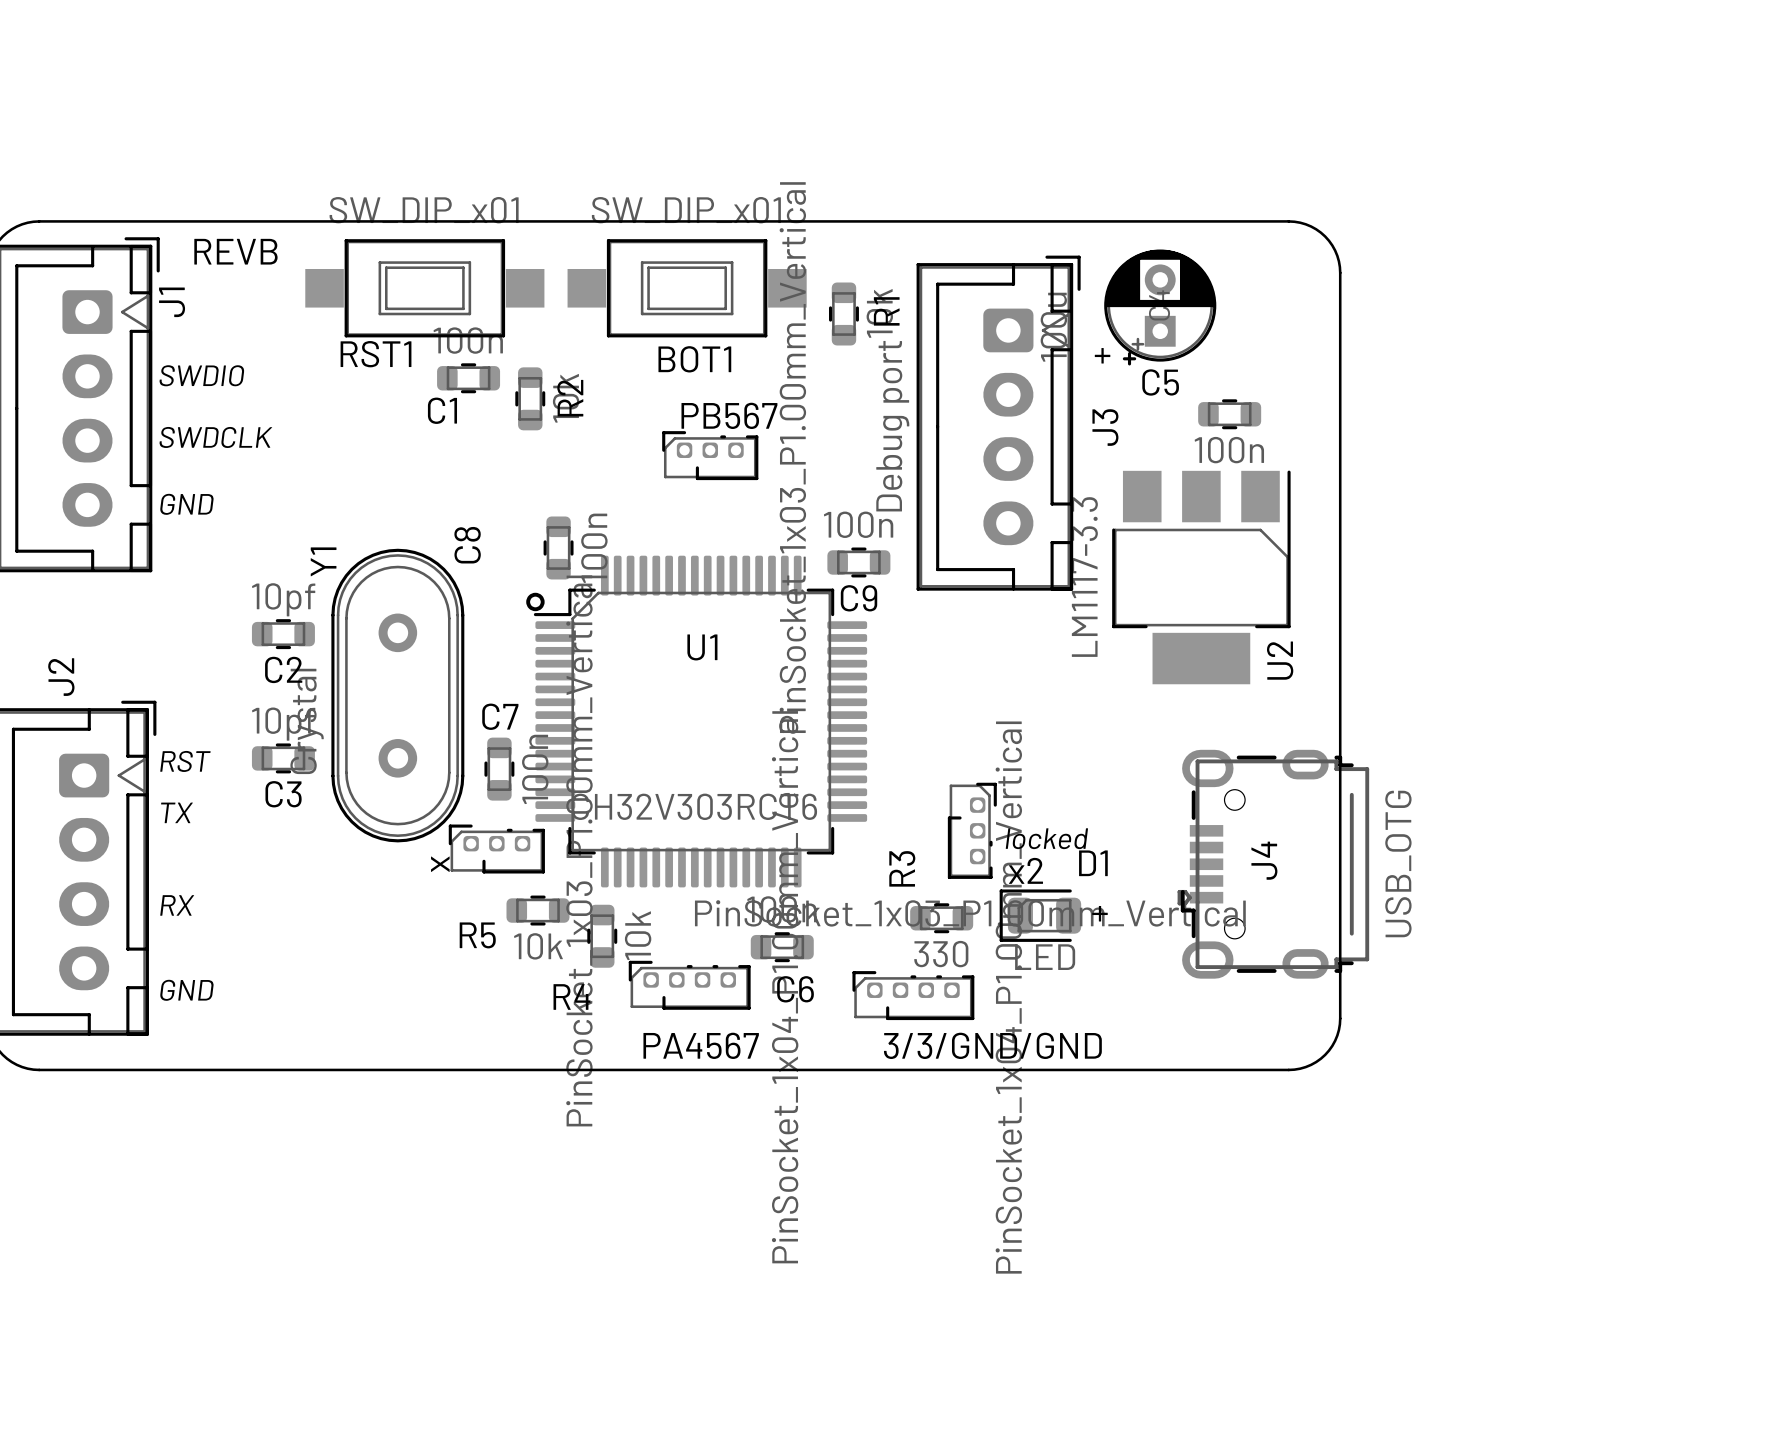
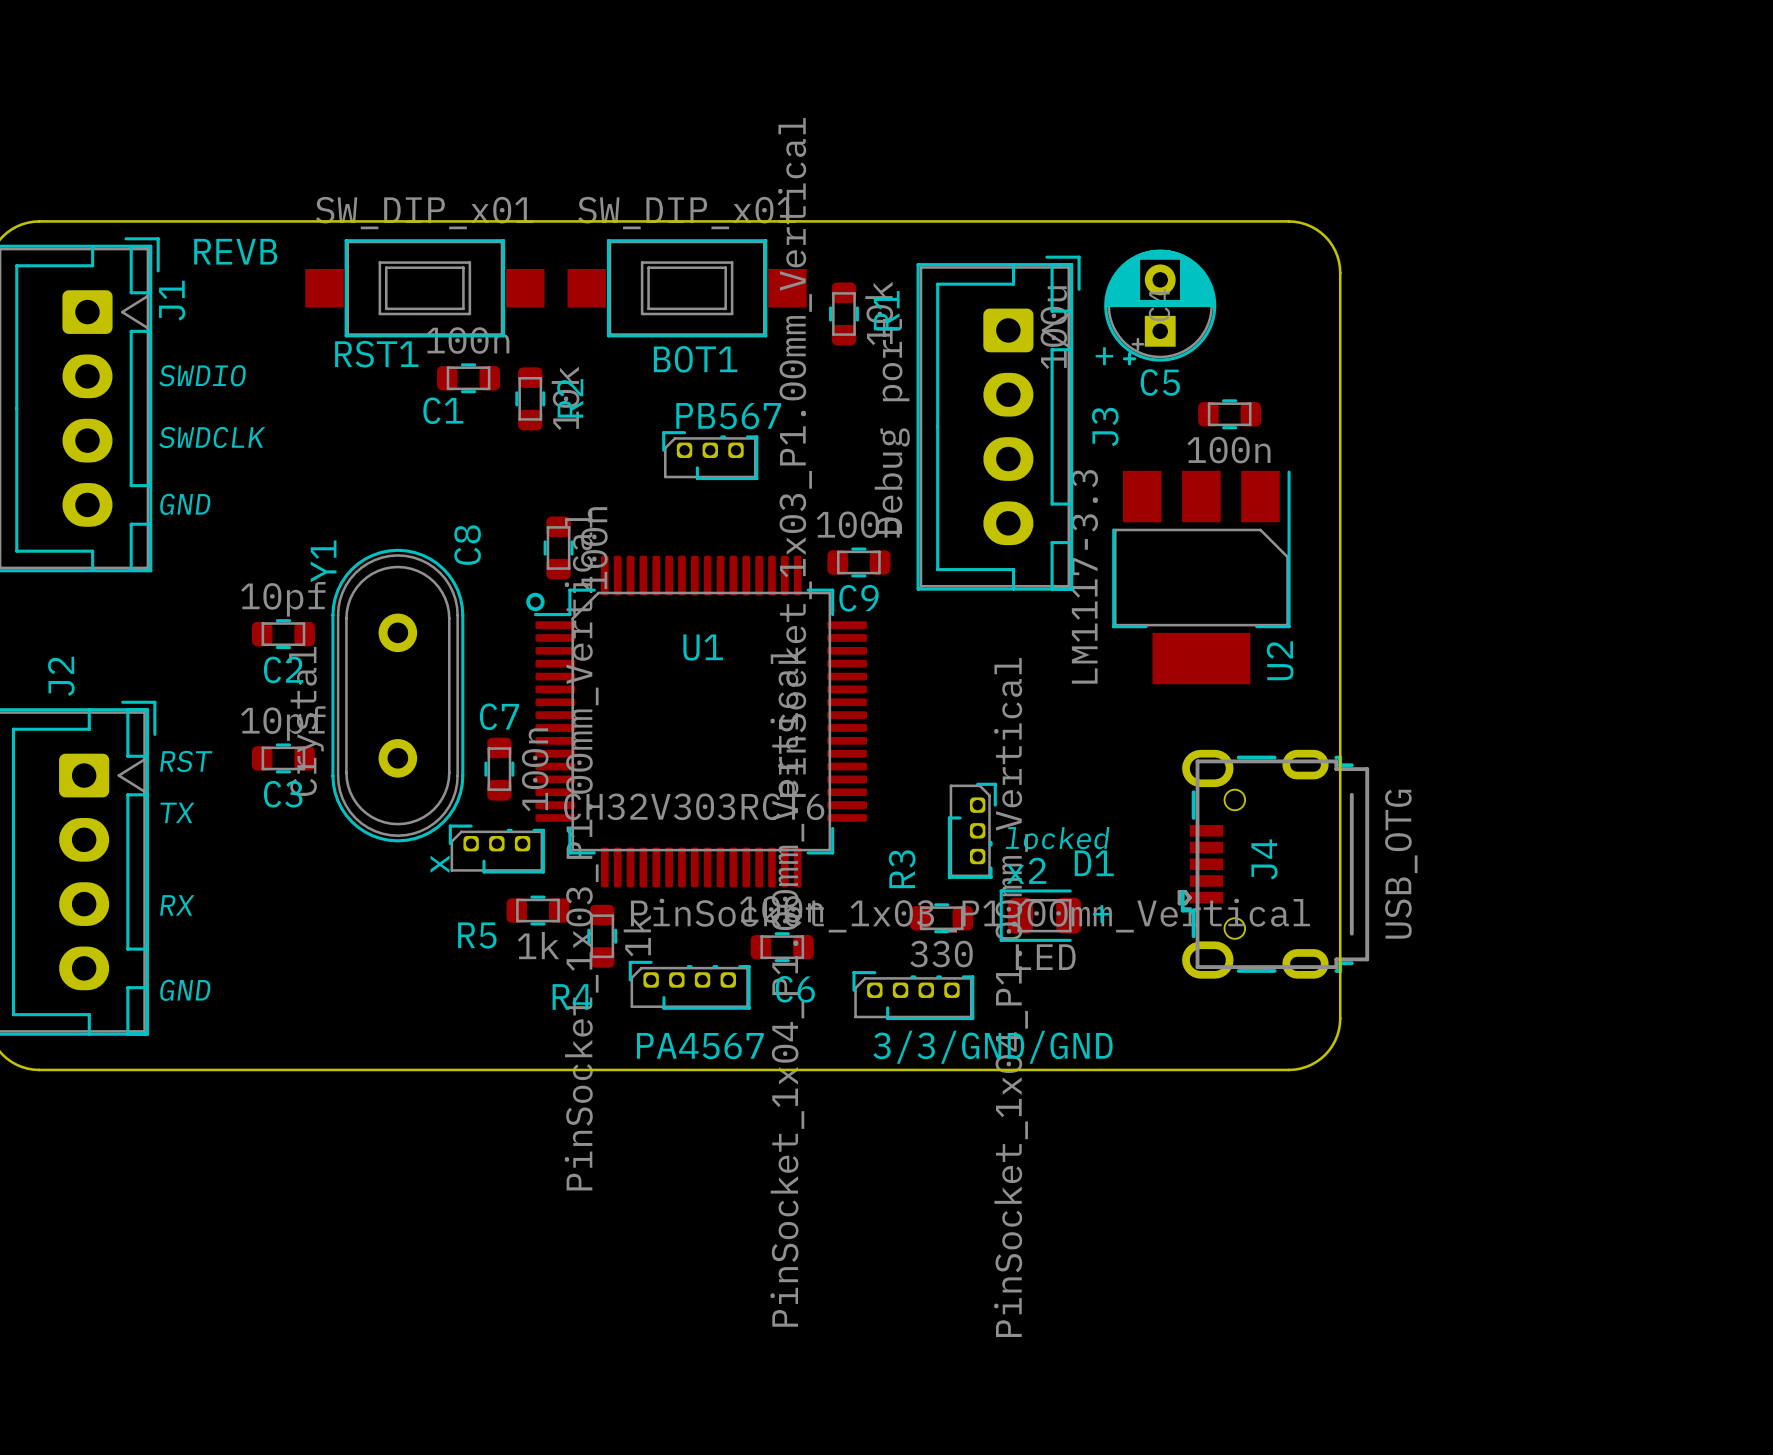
R4 value: 10k (638, 935) -> 1k (637, 935)
R5 value: 10k (538, 946) -> 1k (538, 945)

